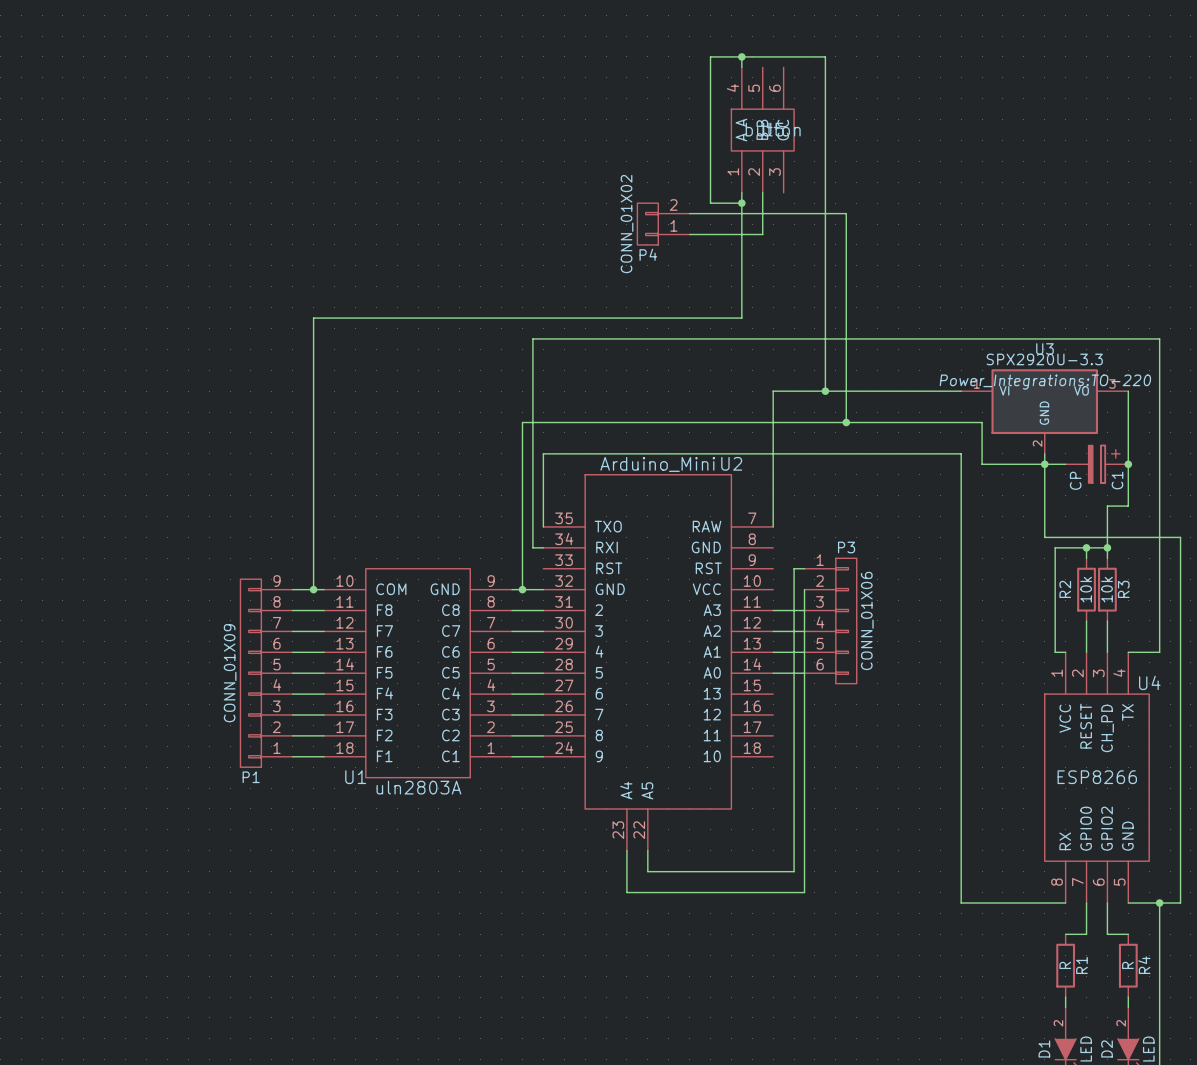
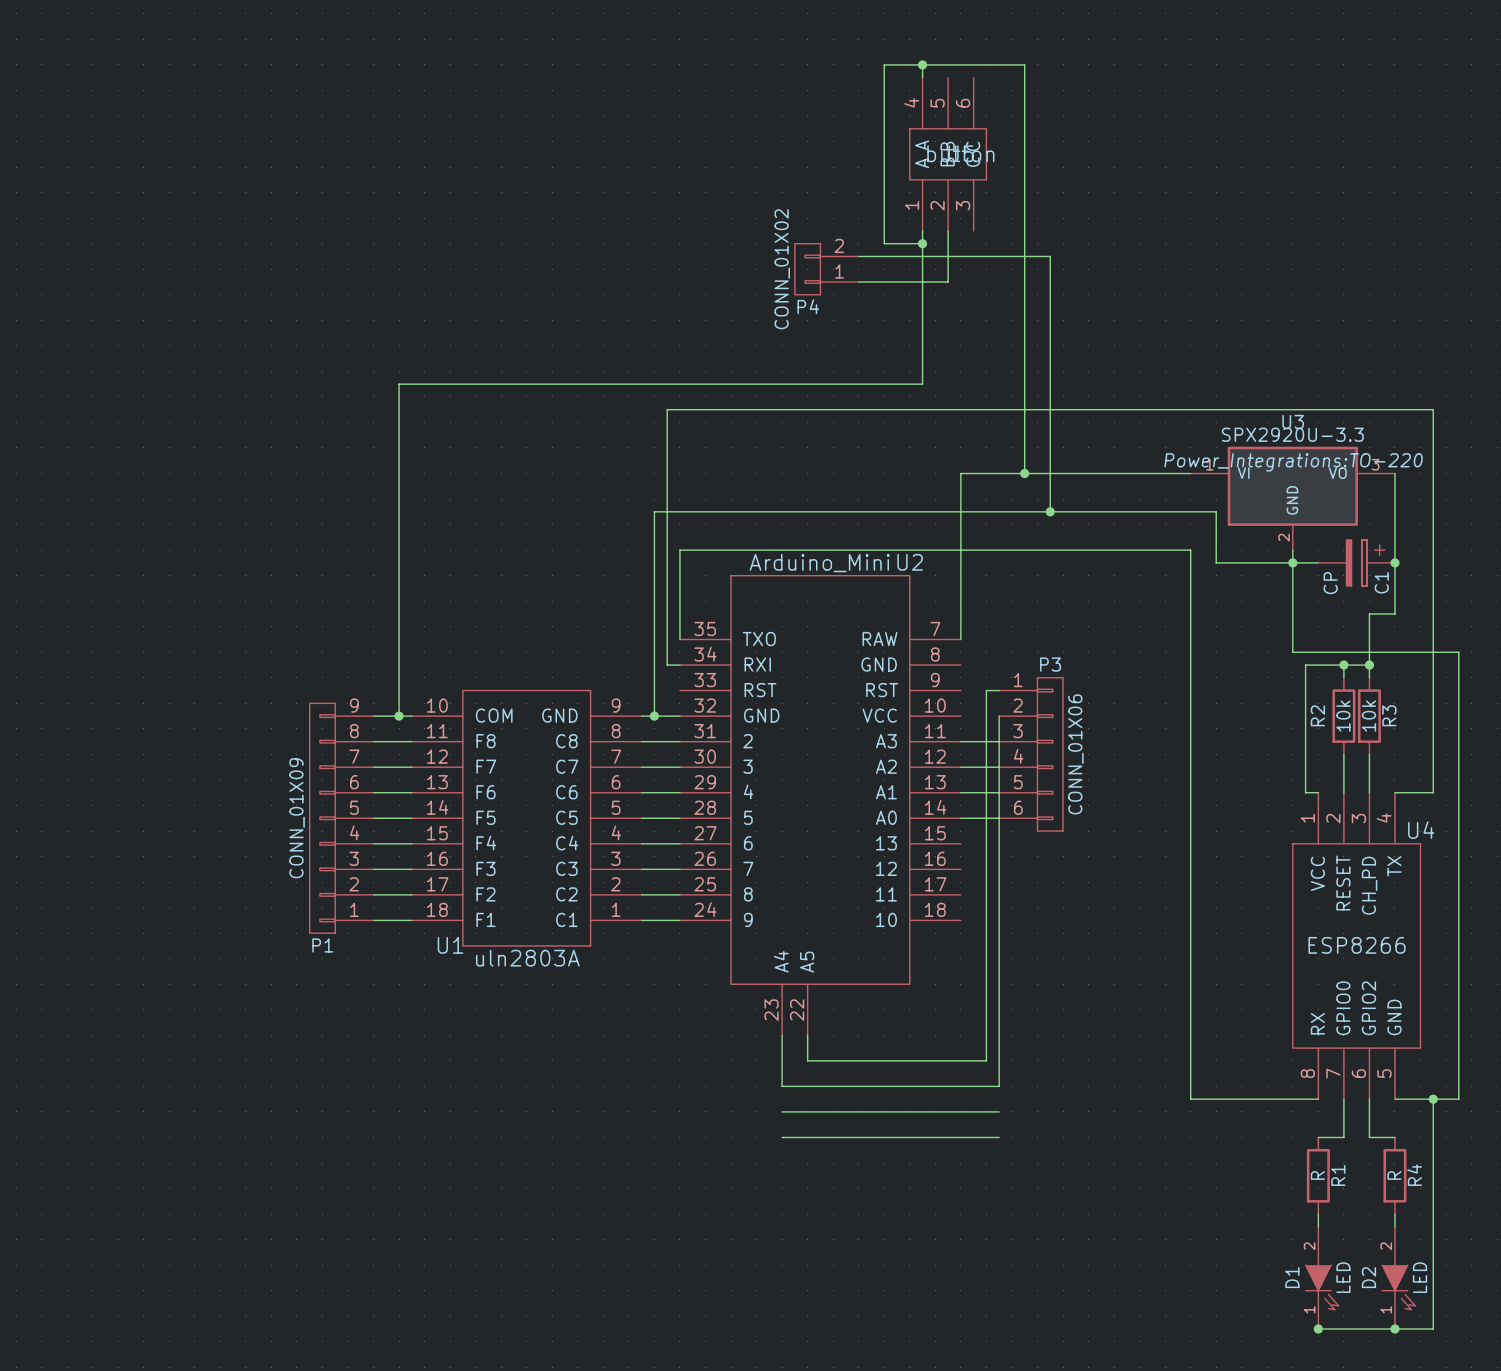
wire: none -> (782, 1111) (999, 1111)
wire: none -> (782, 1137) (999, 1137)

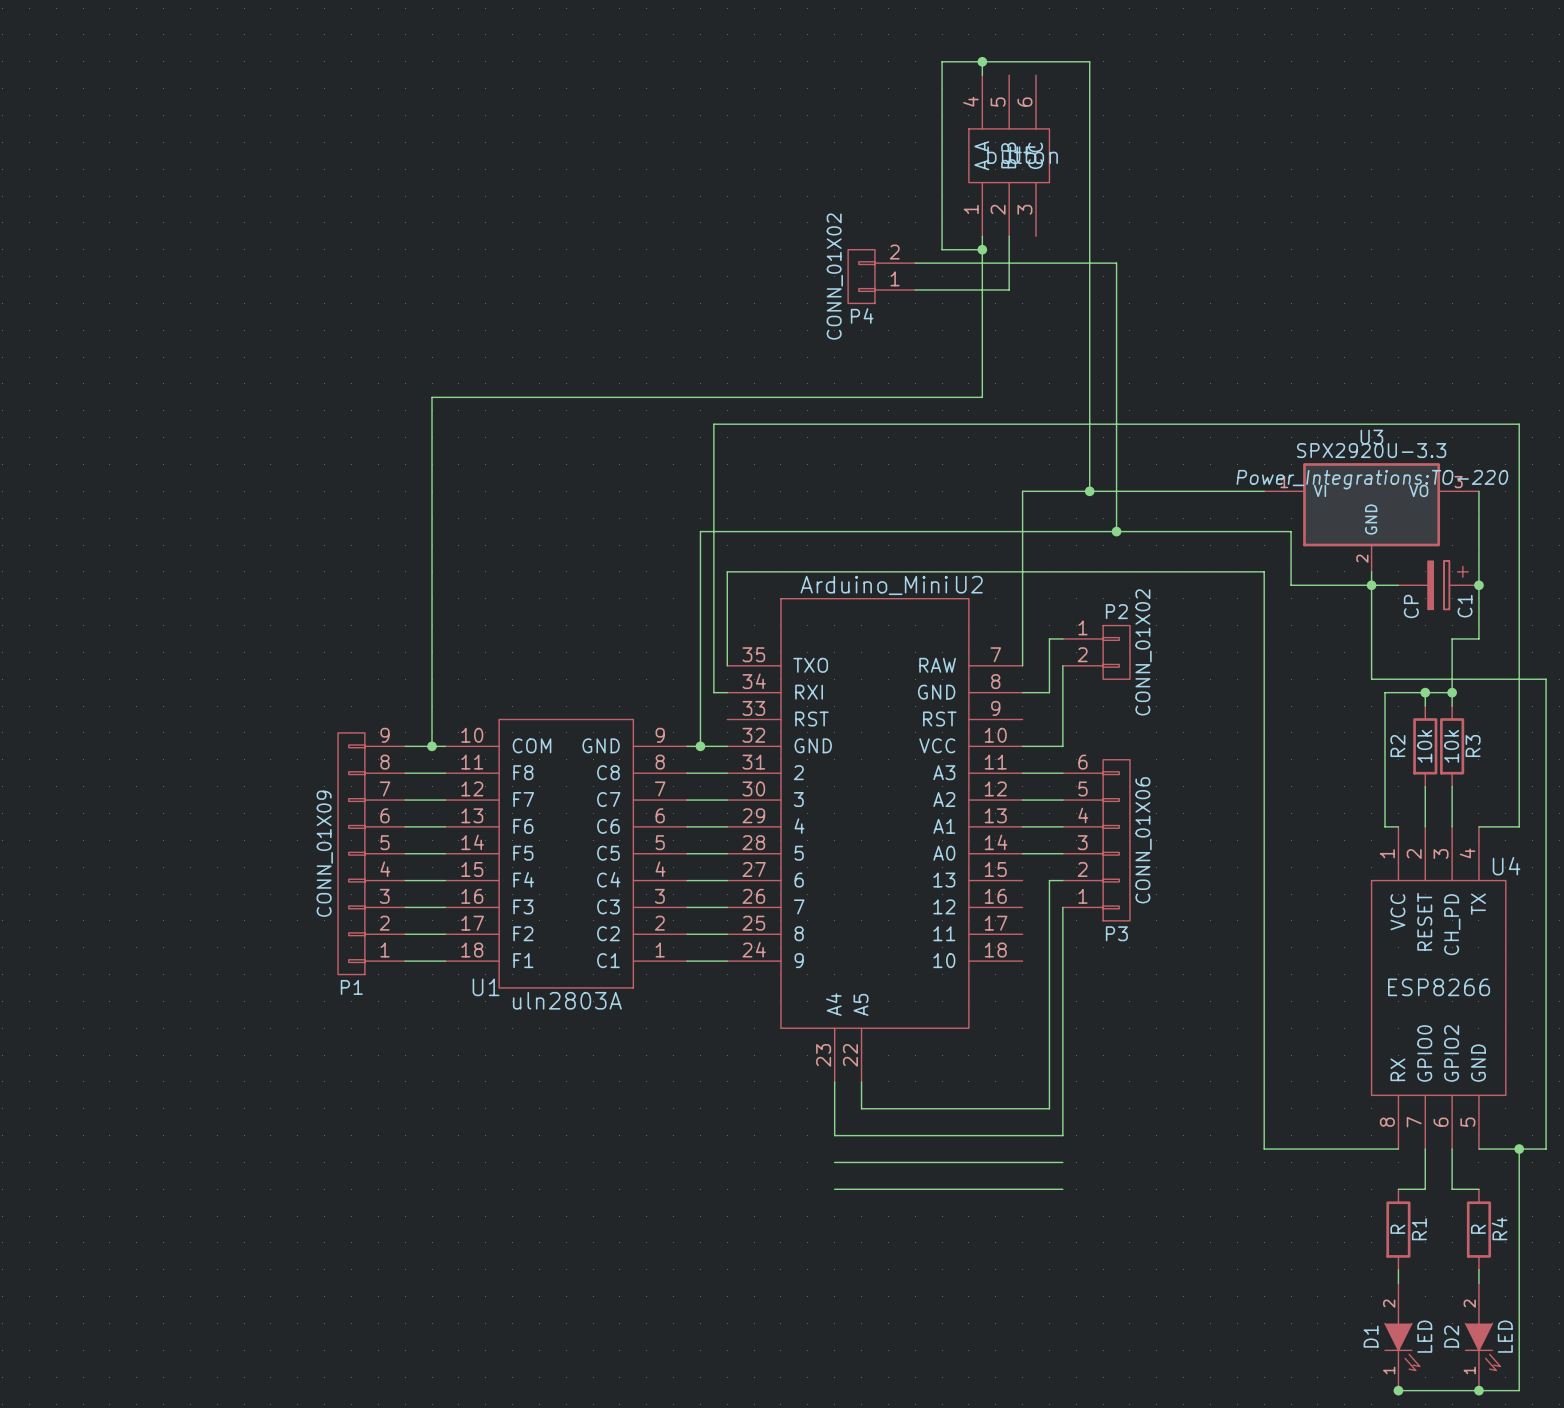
wire: none -> (1062, 638) (1049, 638) (1049, 692) (1022, 692)
P2: none -> CONN_01X02 (1096, 652)
wire: none -> (1062, 665) (1062, 746) (1022, 746)
wire: (999, 690) (986, 690) (986, 843) -> (1062, 880) (1049, 880)
wire: (999, 716) (999, 869) -> none
P3 flip: as is (1050, 754) -> up-down (1116, 840)

